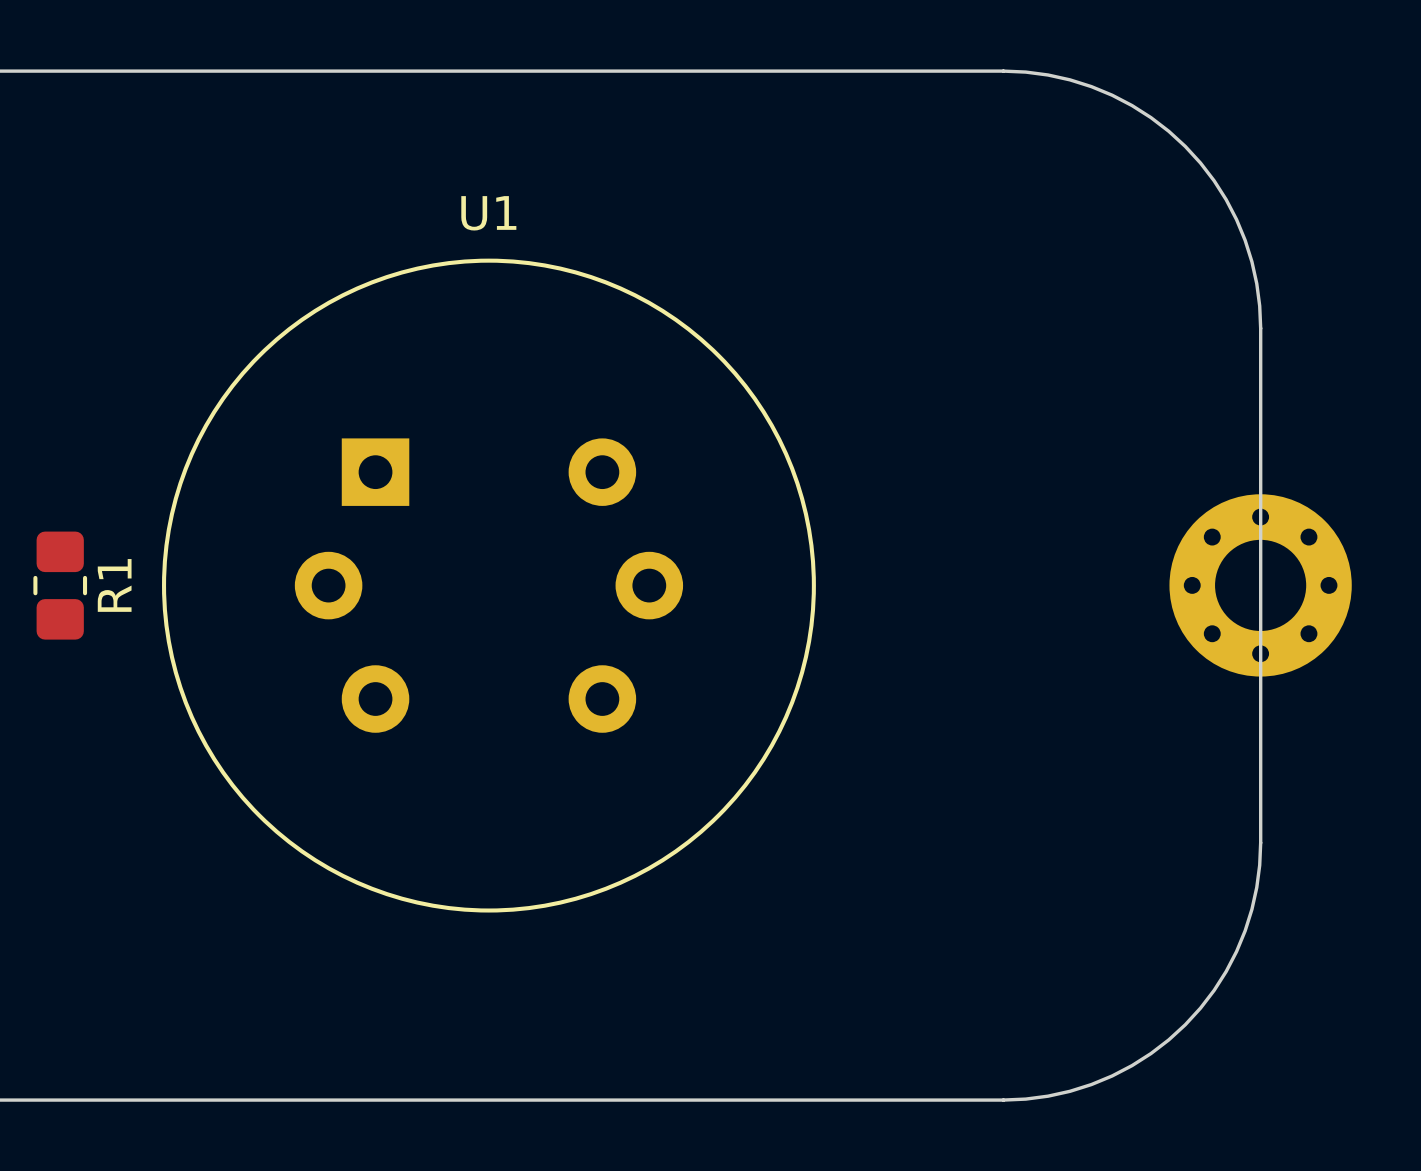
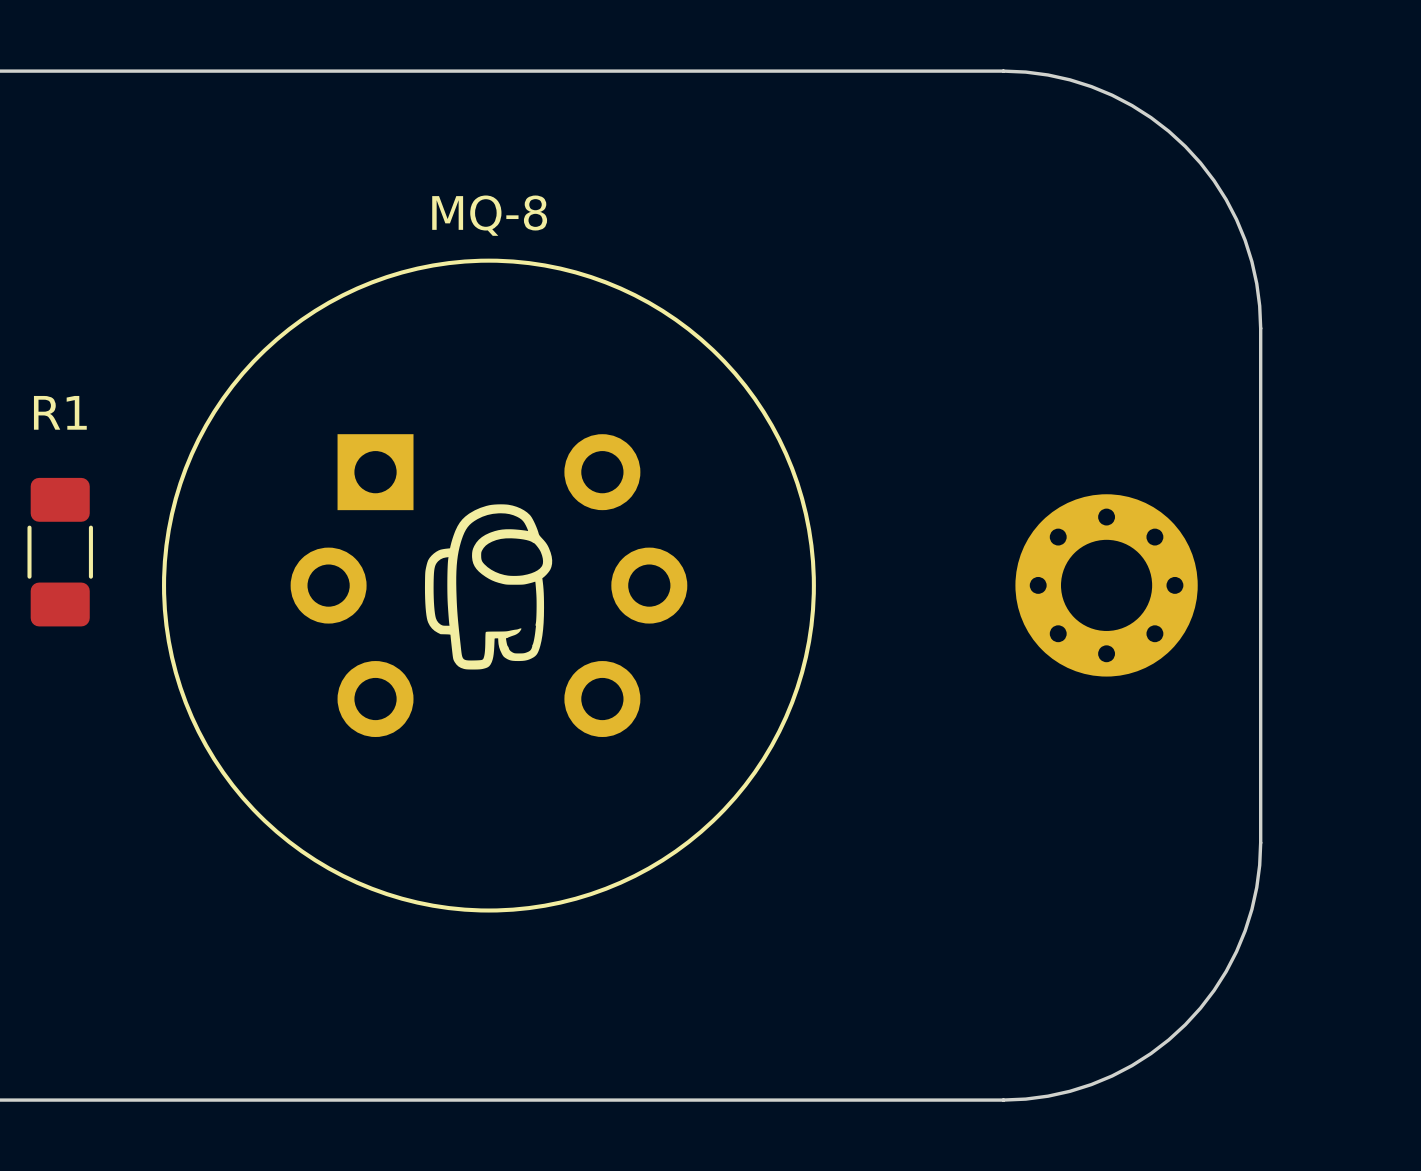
drawing: none -> [424, 504, 553, 670]
R1 footprint: [33, 531, 88, 640] -> [27, 477, 93, 627]
R1 name position: R1 (114, 585) -> R1 (60, 412)
U1: (488, 585) -> none
MQ-8: none -> (488, 585)
part position: (1260, 585) -> (1106, 585)

